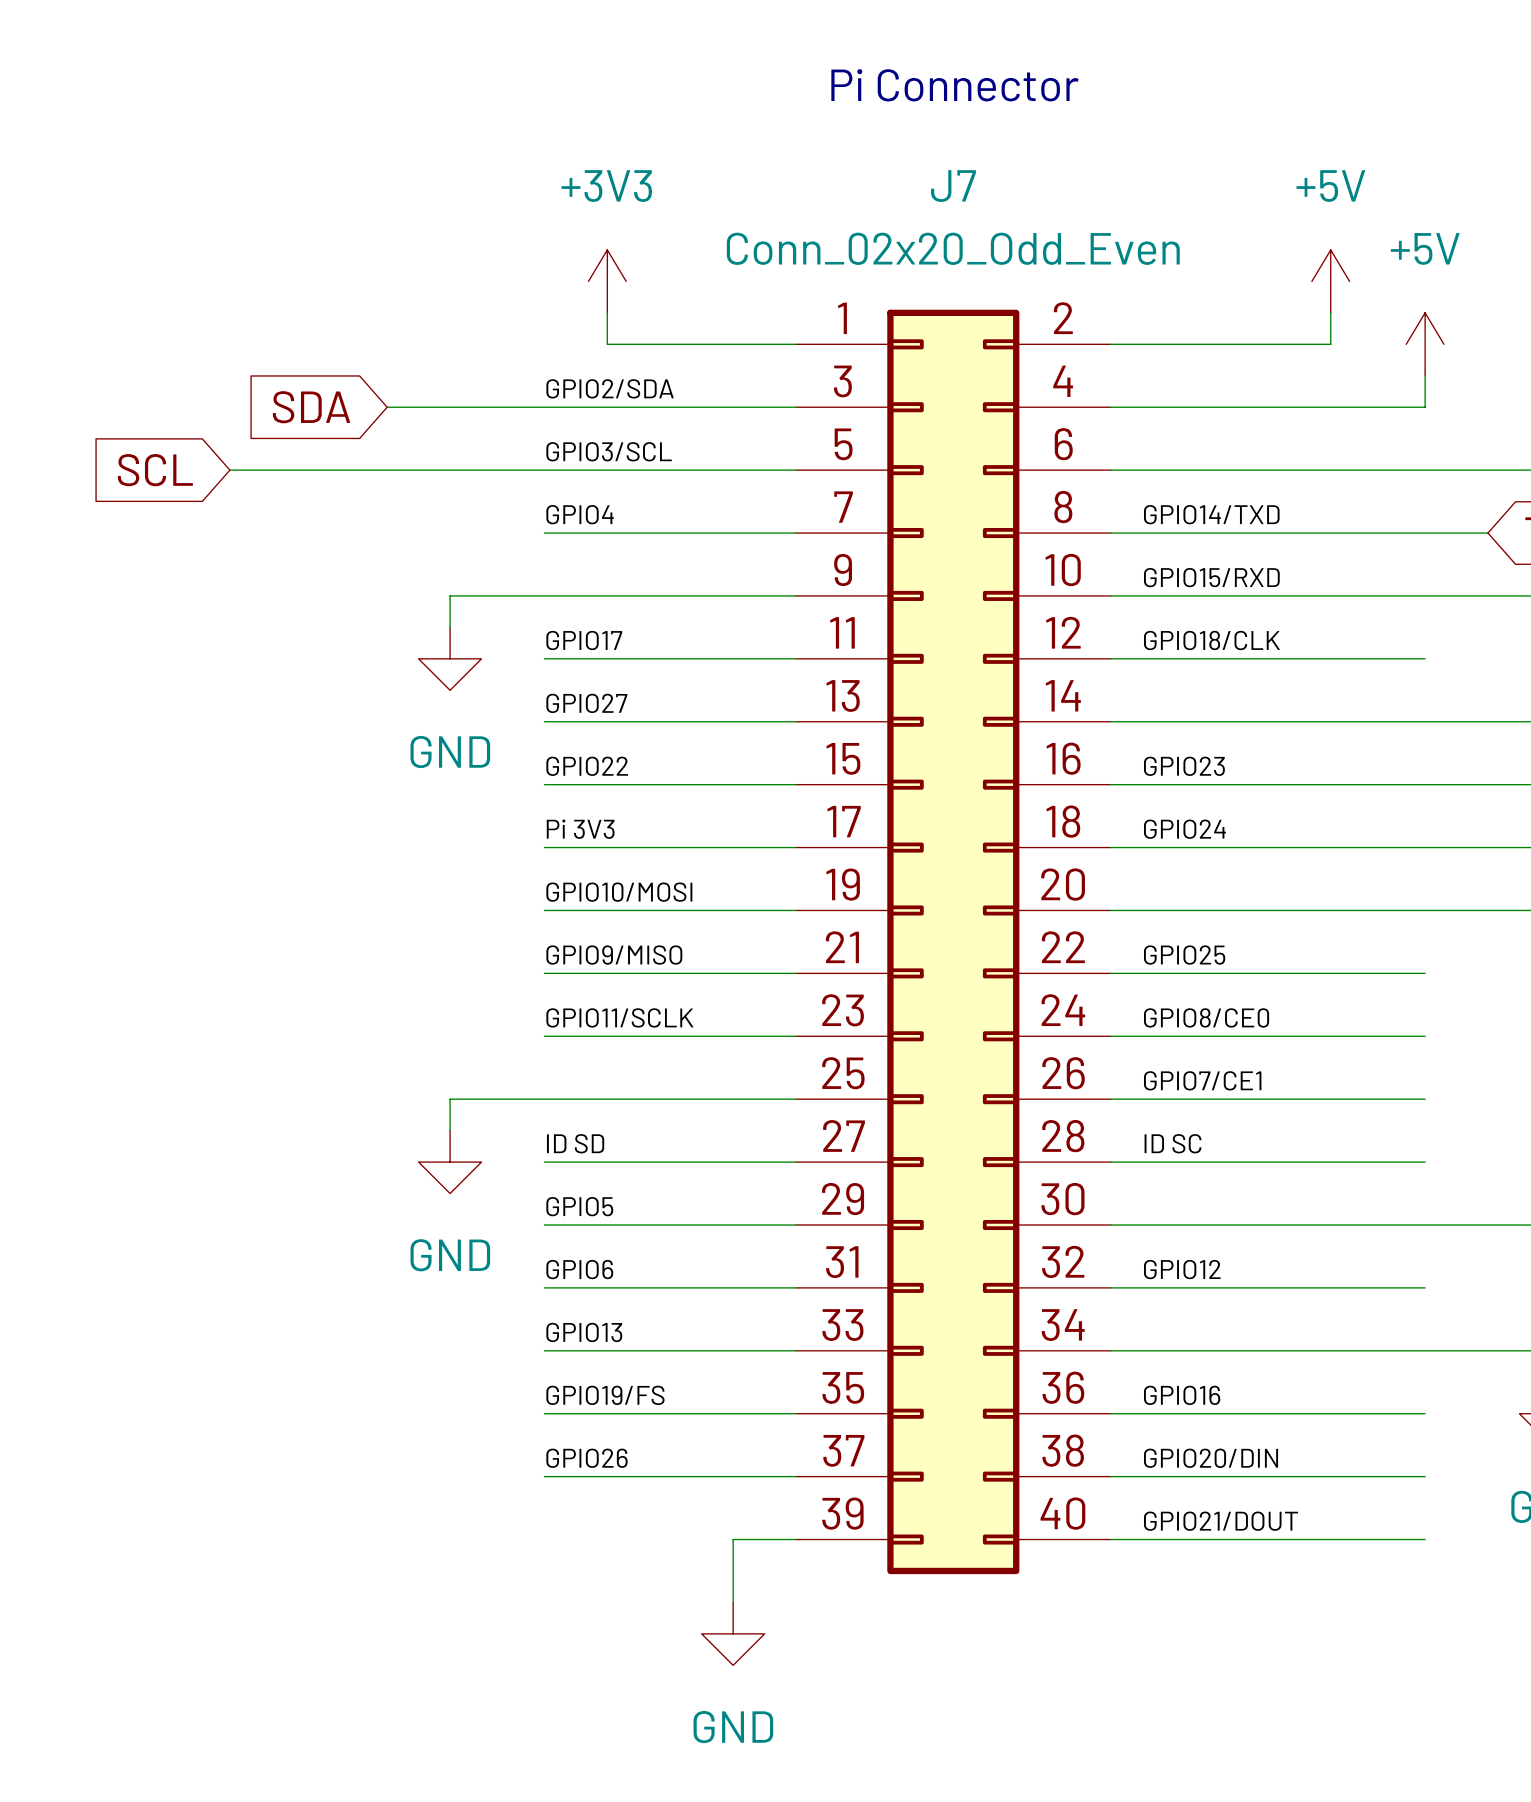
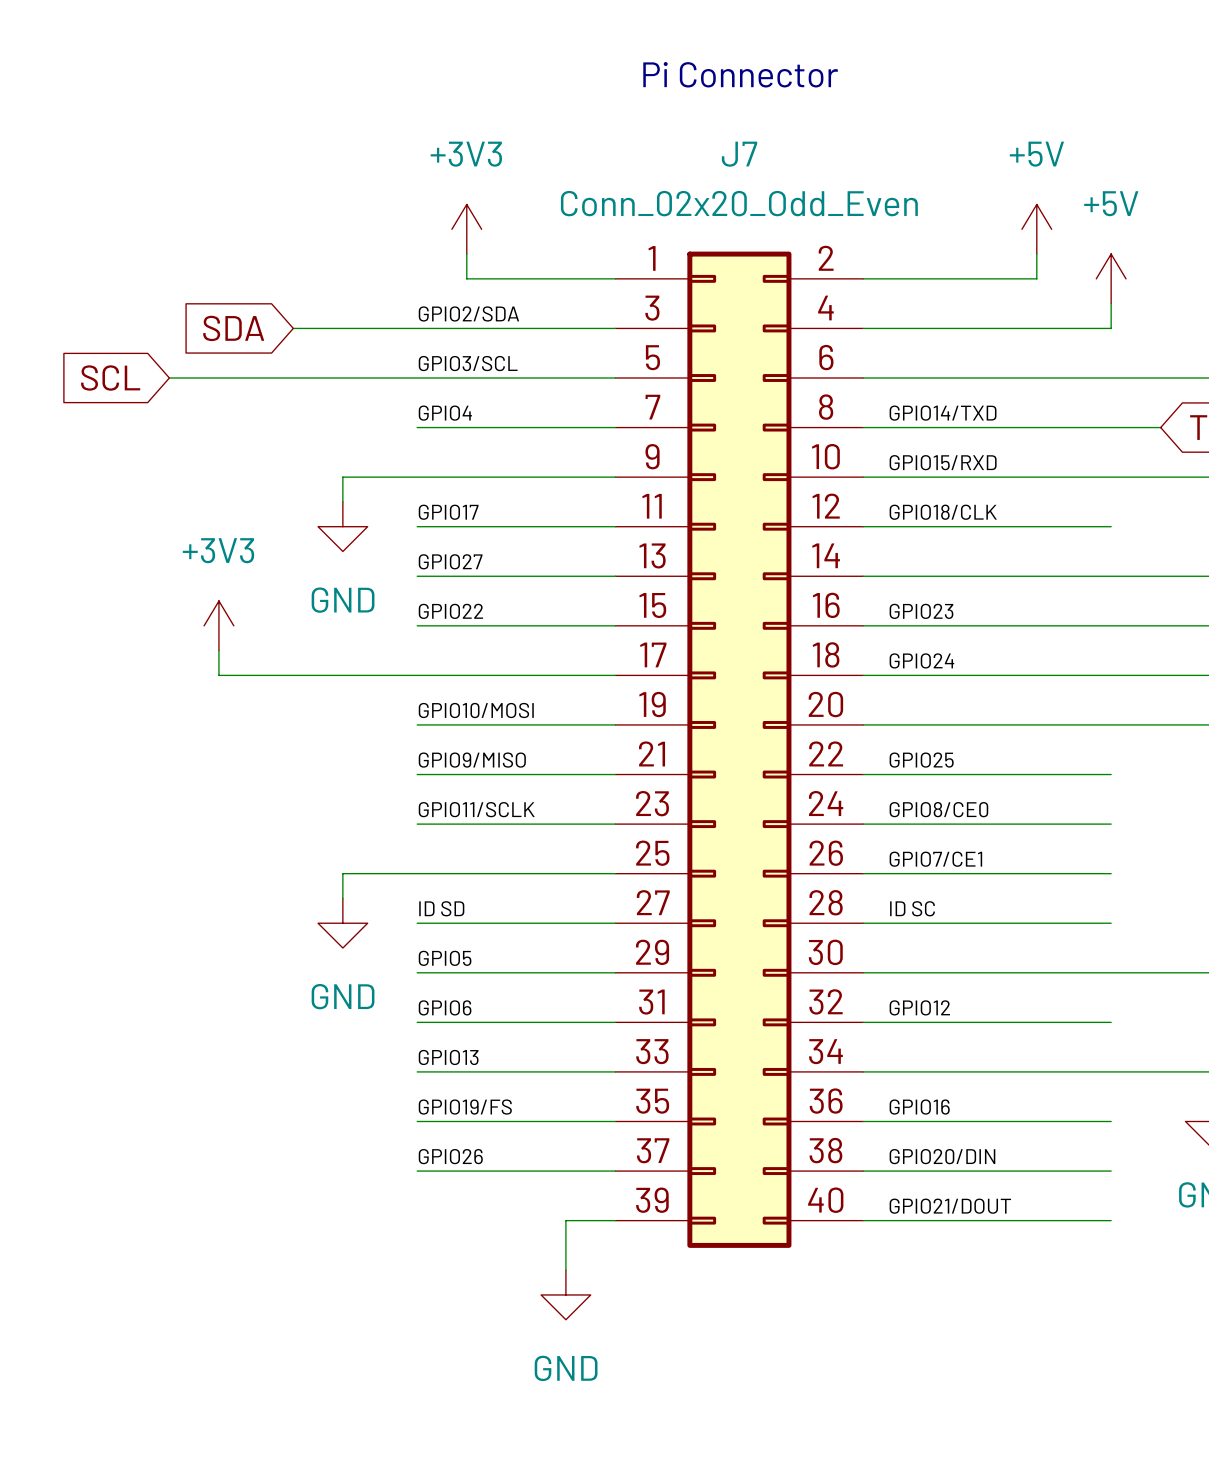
power symbol: none -> +3V3 (218, 625)
wire: none -> (218, 650) (218, 675) (417, 675)
label: Pi 3V3 (580, 829) -> none

